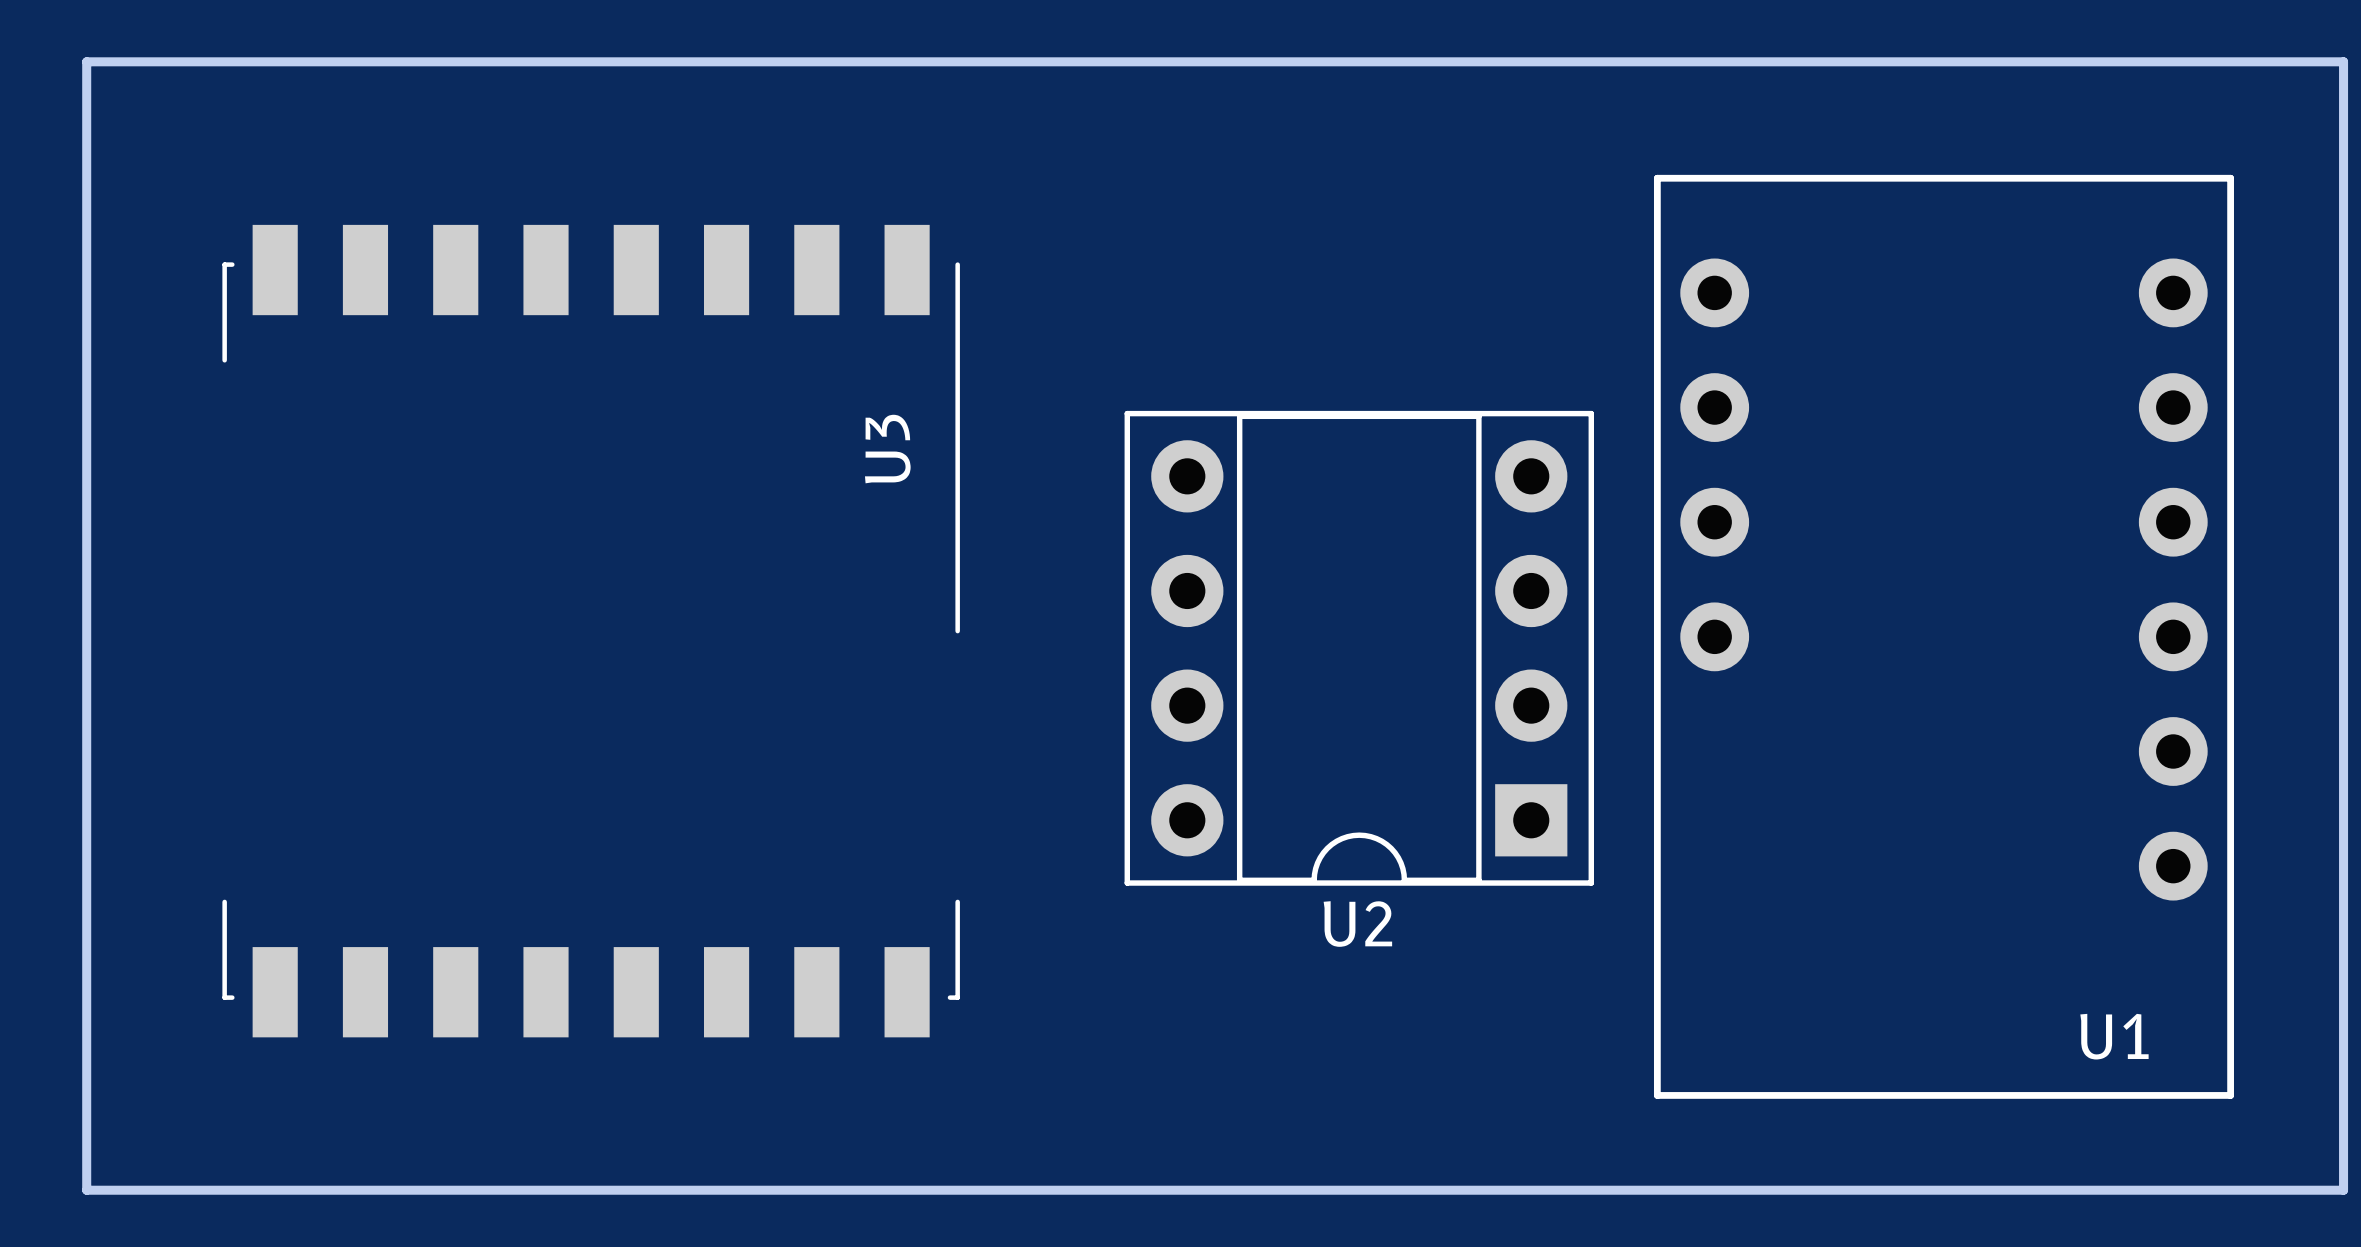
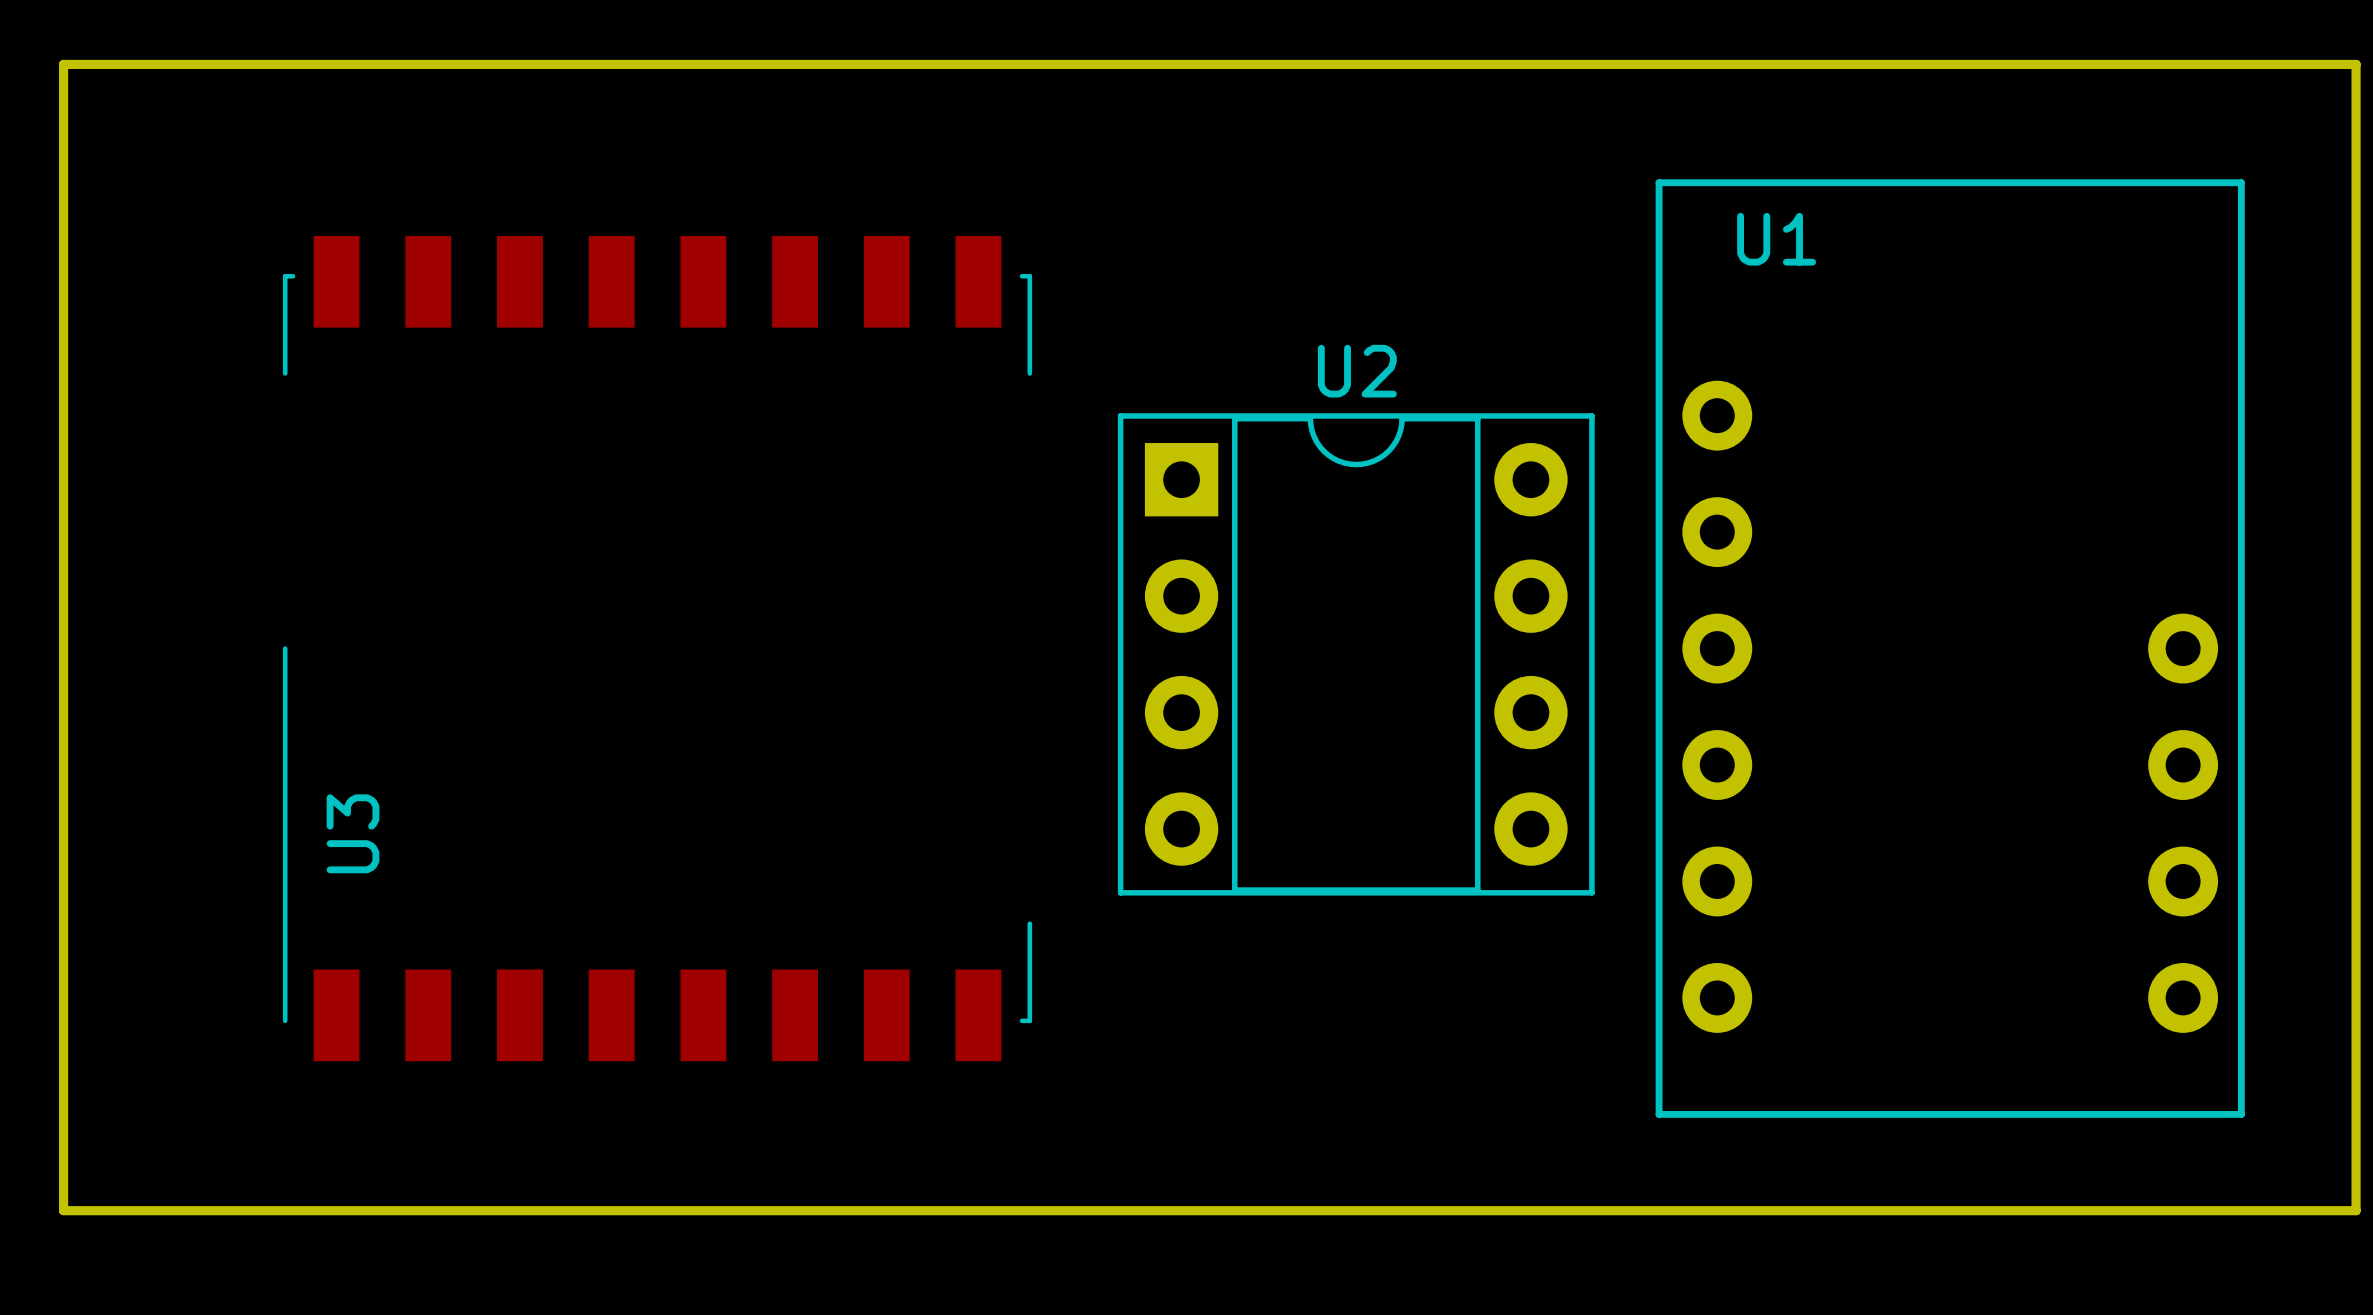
U3 rotation: 0° (591, 631) -> 180° (657, 648)
U1 rotation: 0° (1943, 636) -> 180° (1950, 648)
U2 rotation: 0° (1359, 648) -> 180° (1356, 654)

